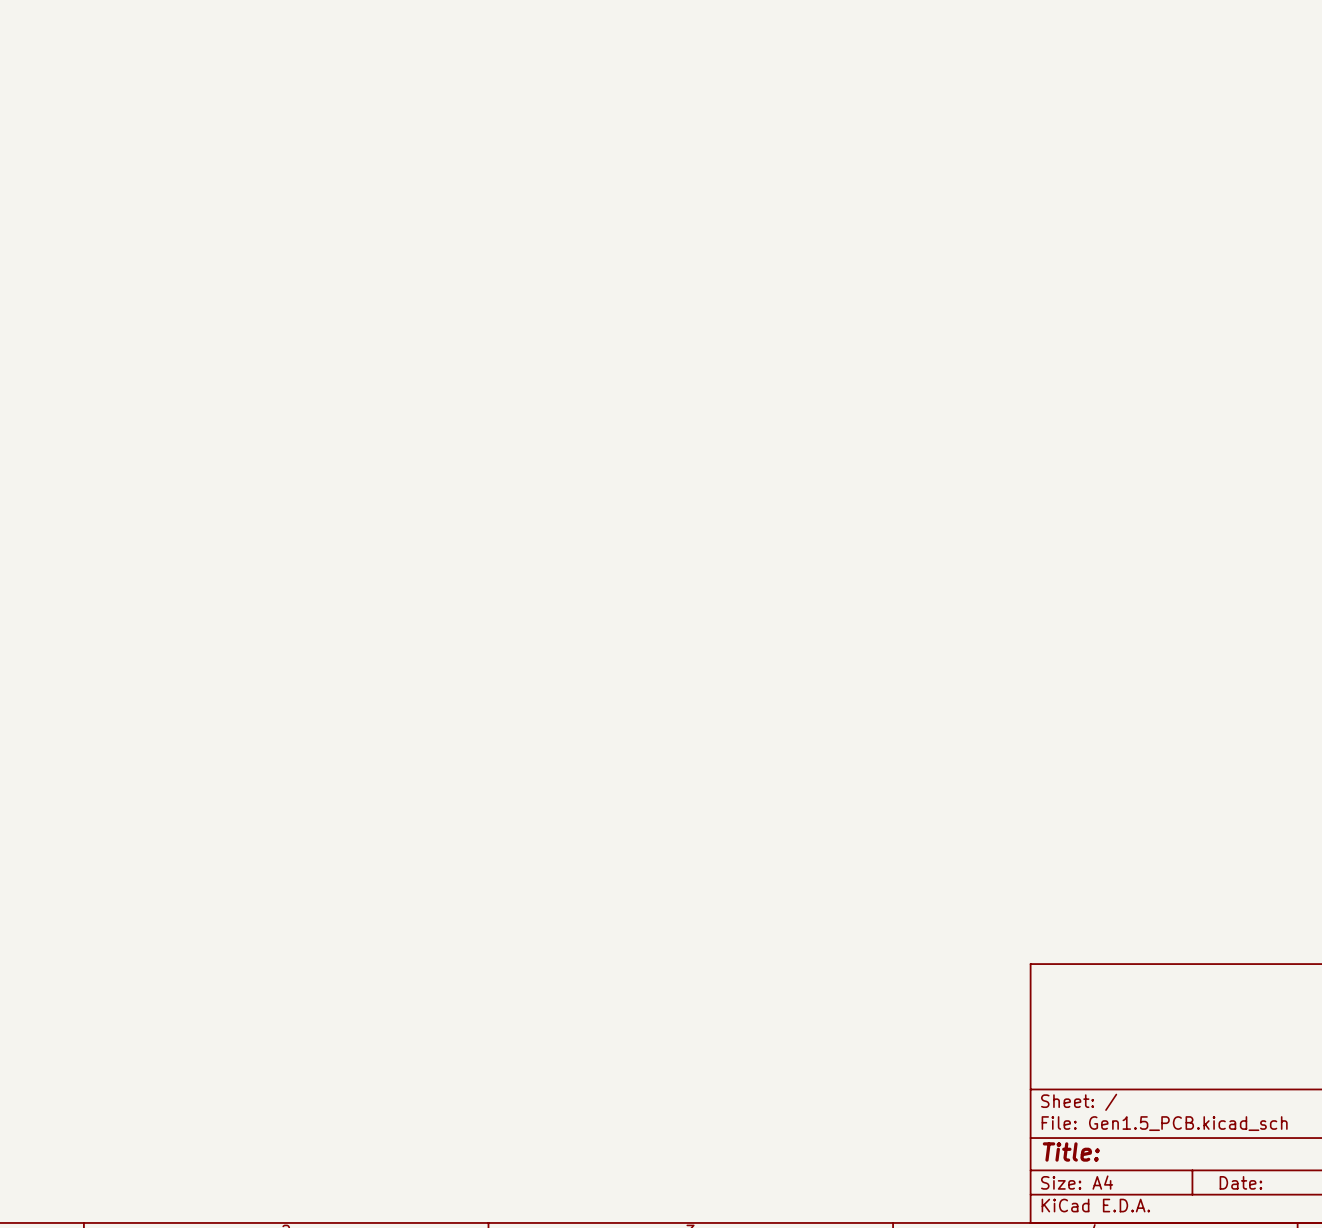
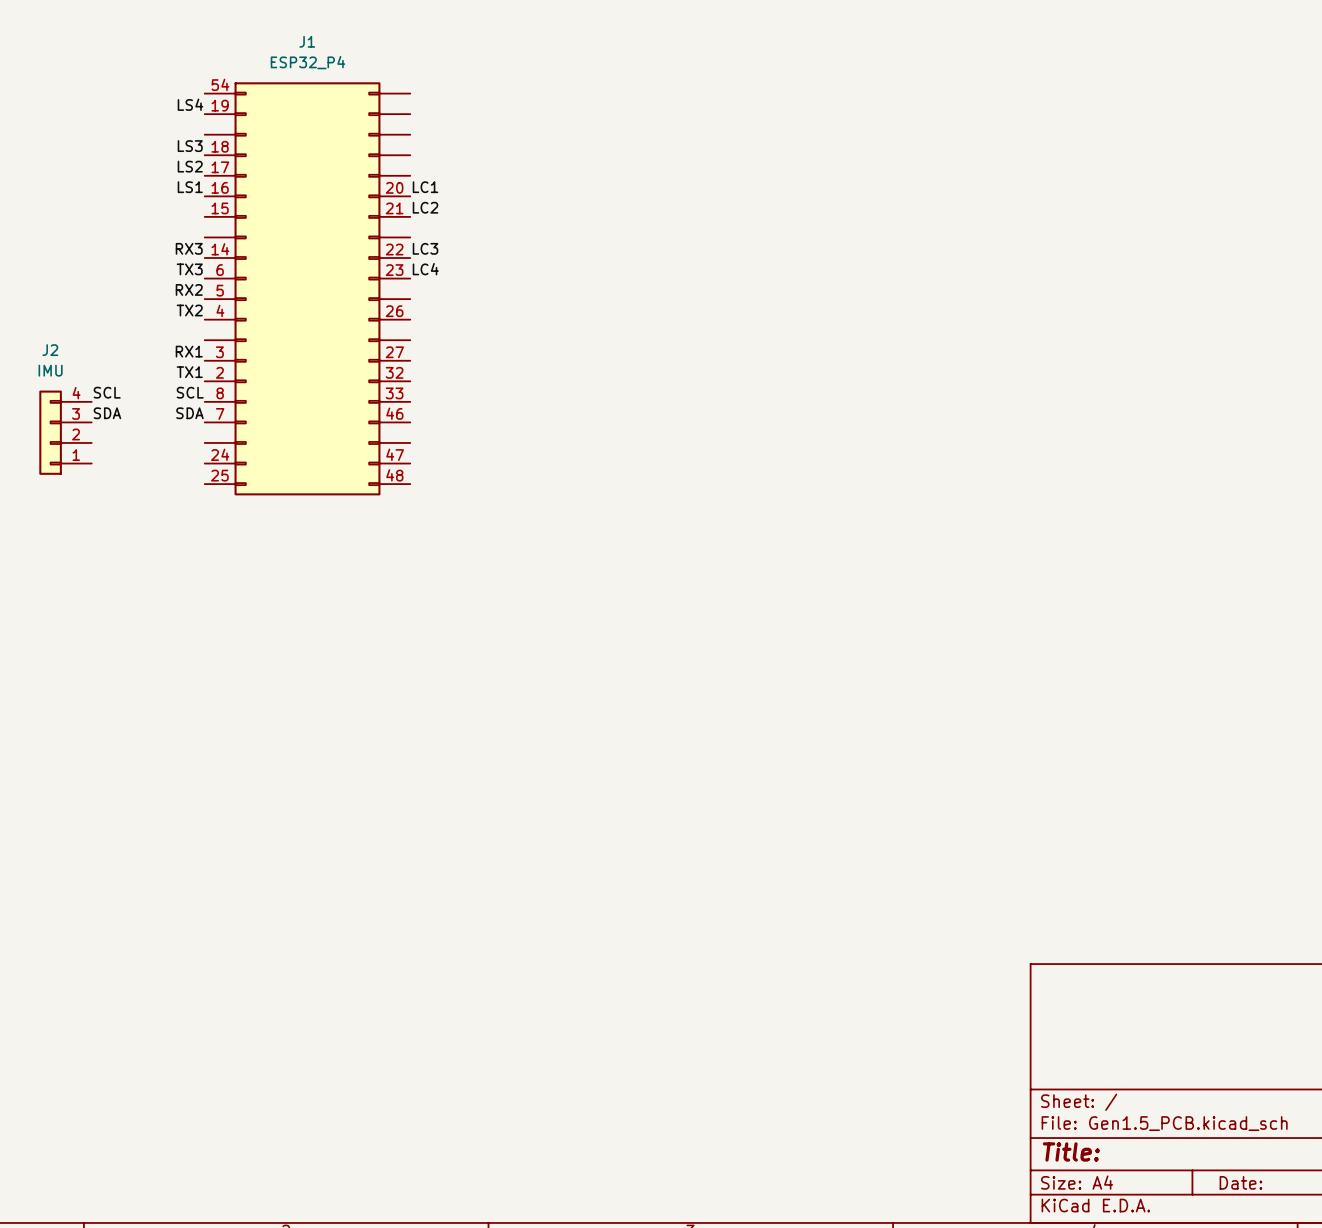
label: none -> LS4 (190, 104)
label: none -> LS3 (190, 146)
label: none -> LS2 (190, 166)
label: none -> LS1 (190, 187)
label: none -> LC1 (425, 187)
label: none -> LC2 (425, 207)
label: none -> RX3 (189, 248)
label: none -> LC3 (425, 248)
label: none -> TX3 (189, 269)
label: none -> LC4 (425, 269)
J1: none -> ESP32_P4 (307, 288)
label: none -> RX2 (189, 289)
label: none -> TX2 (189, 310)
label: none -> RX1 (189, 351)
label: none -> TX1 (189, 372)
label: none -> SCL (107, 392)
label: none -> SCL (190, 392)
label: none -> SDA (107, 413)
label: none -> SDA (189, 413)
J2: none -> IMU (65, 432)

